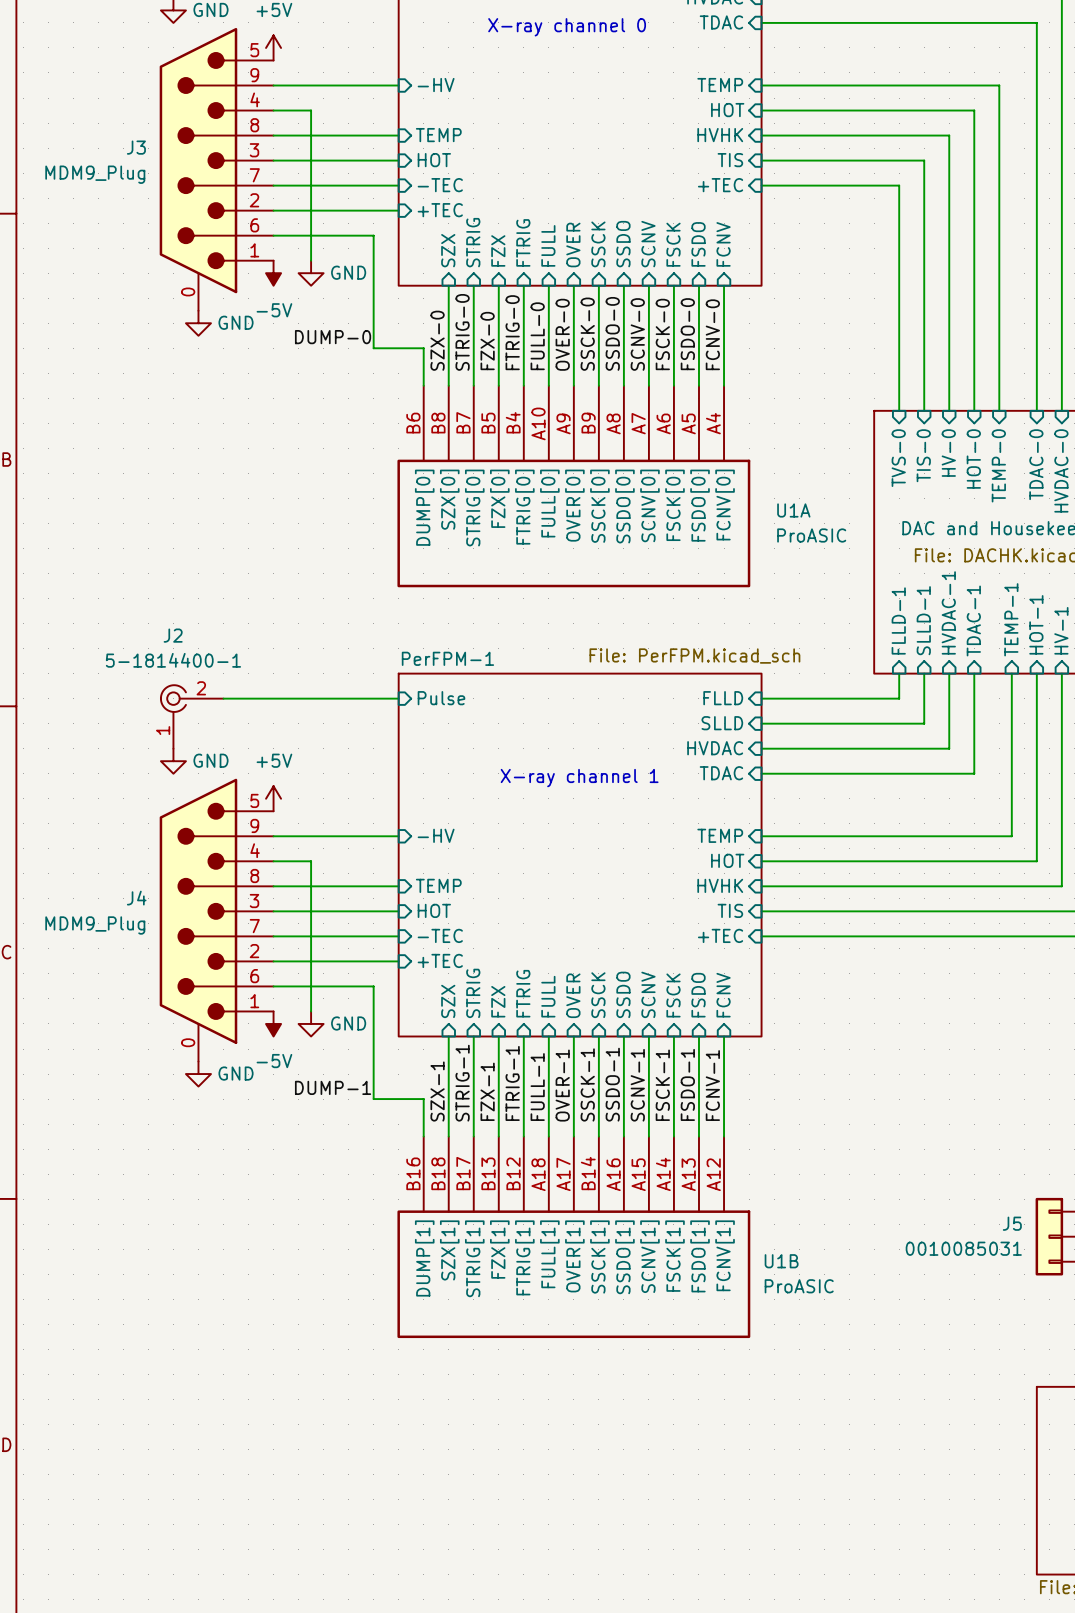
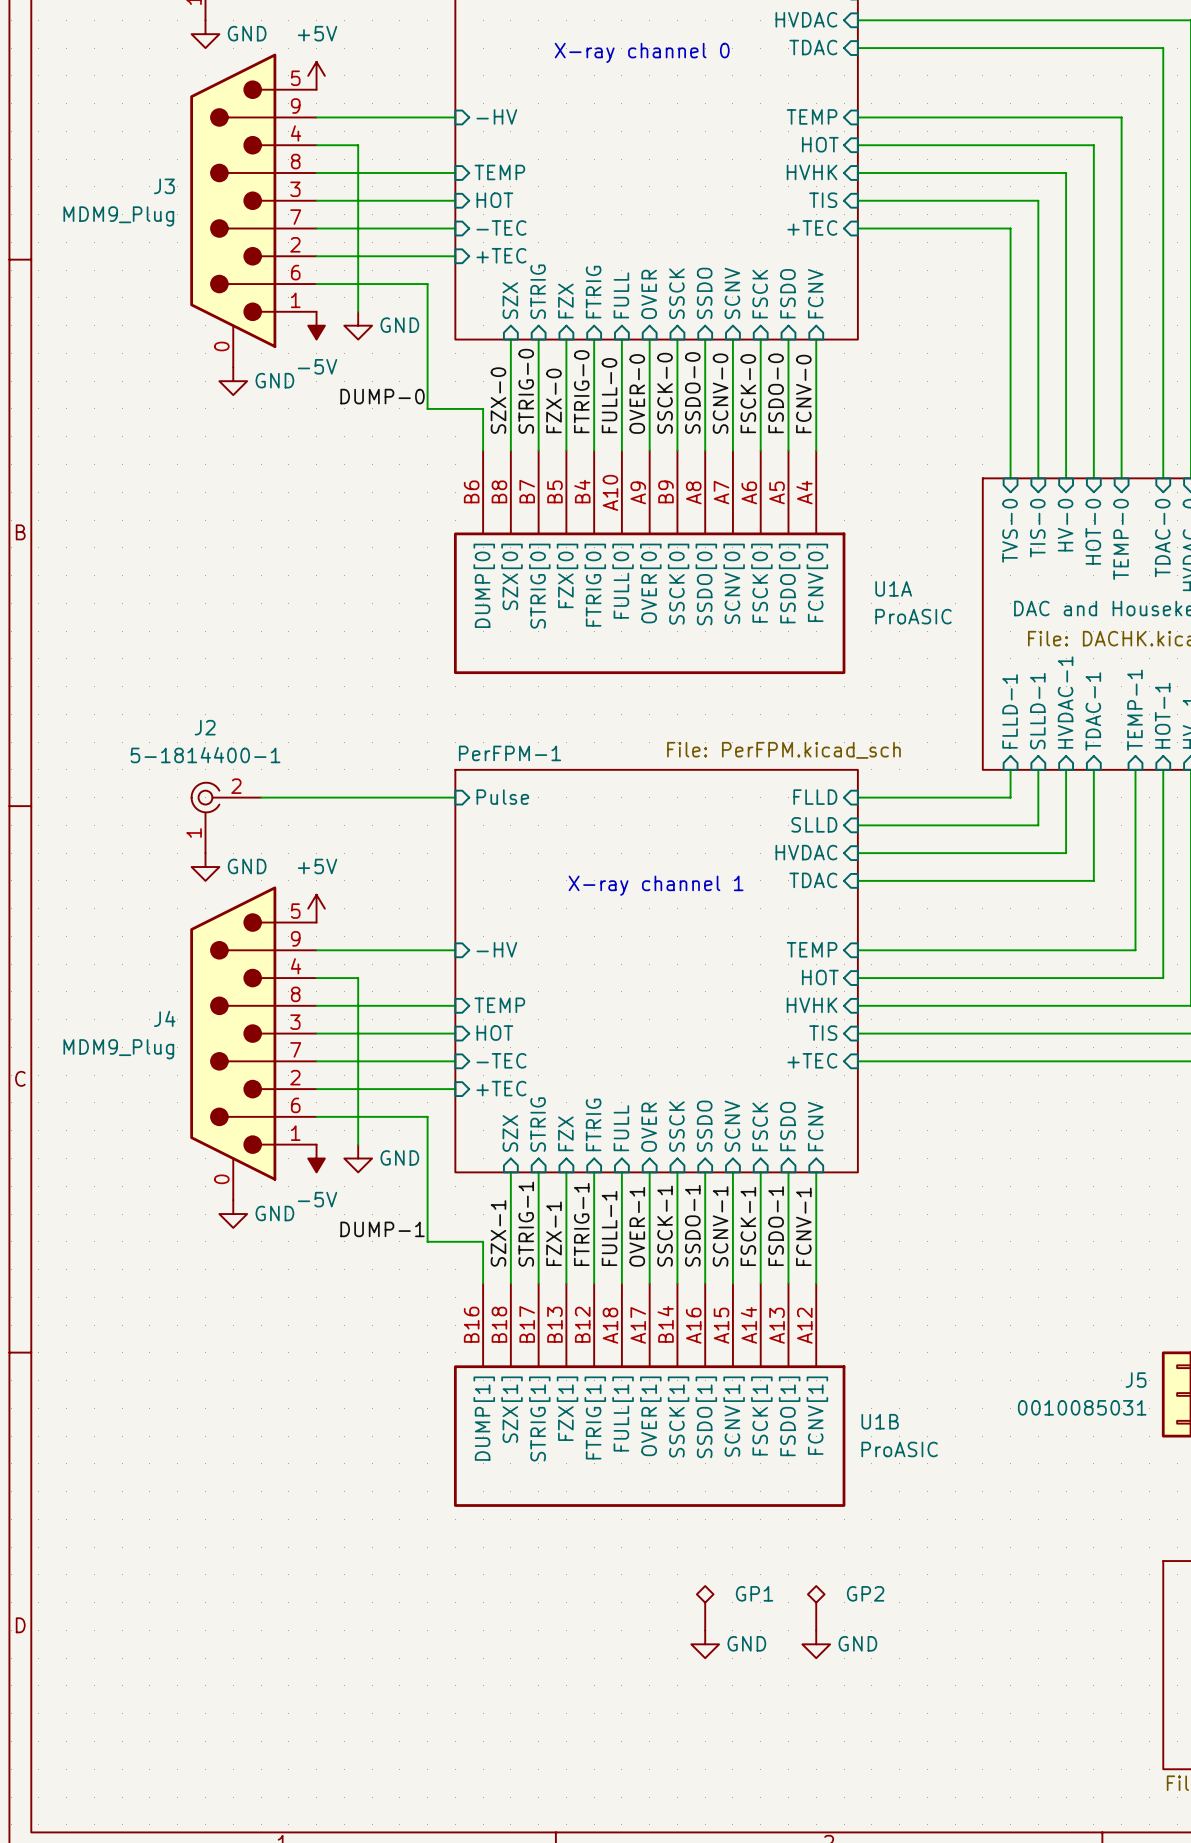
GP1: none -> (705, 1608)
GP2: none -> (816, 1608)
power symbol: none -> GND (705, 1644)
power symbol: none -> GND (816, 1644)

